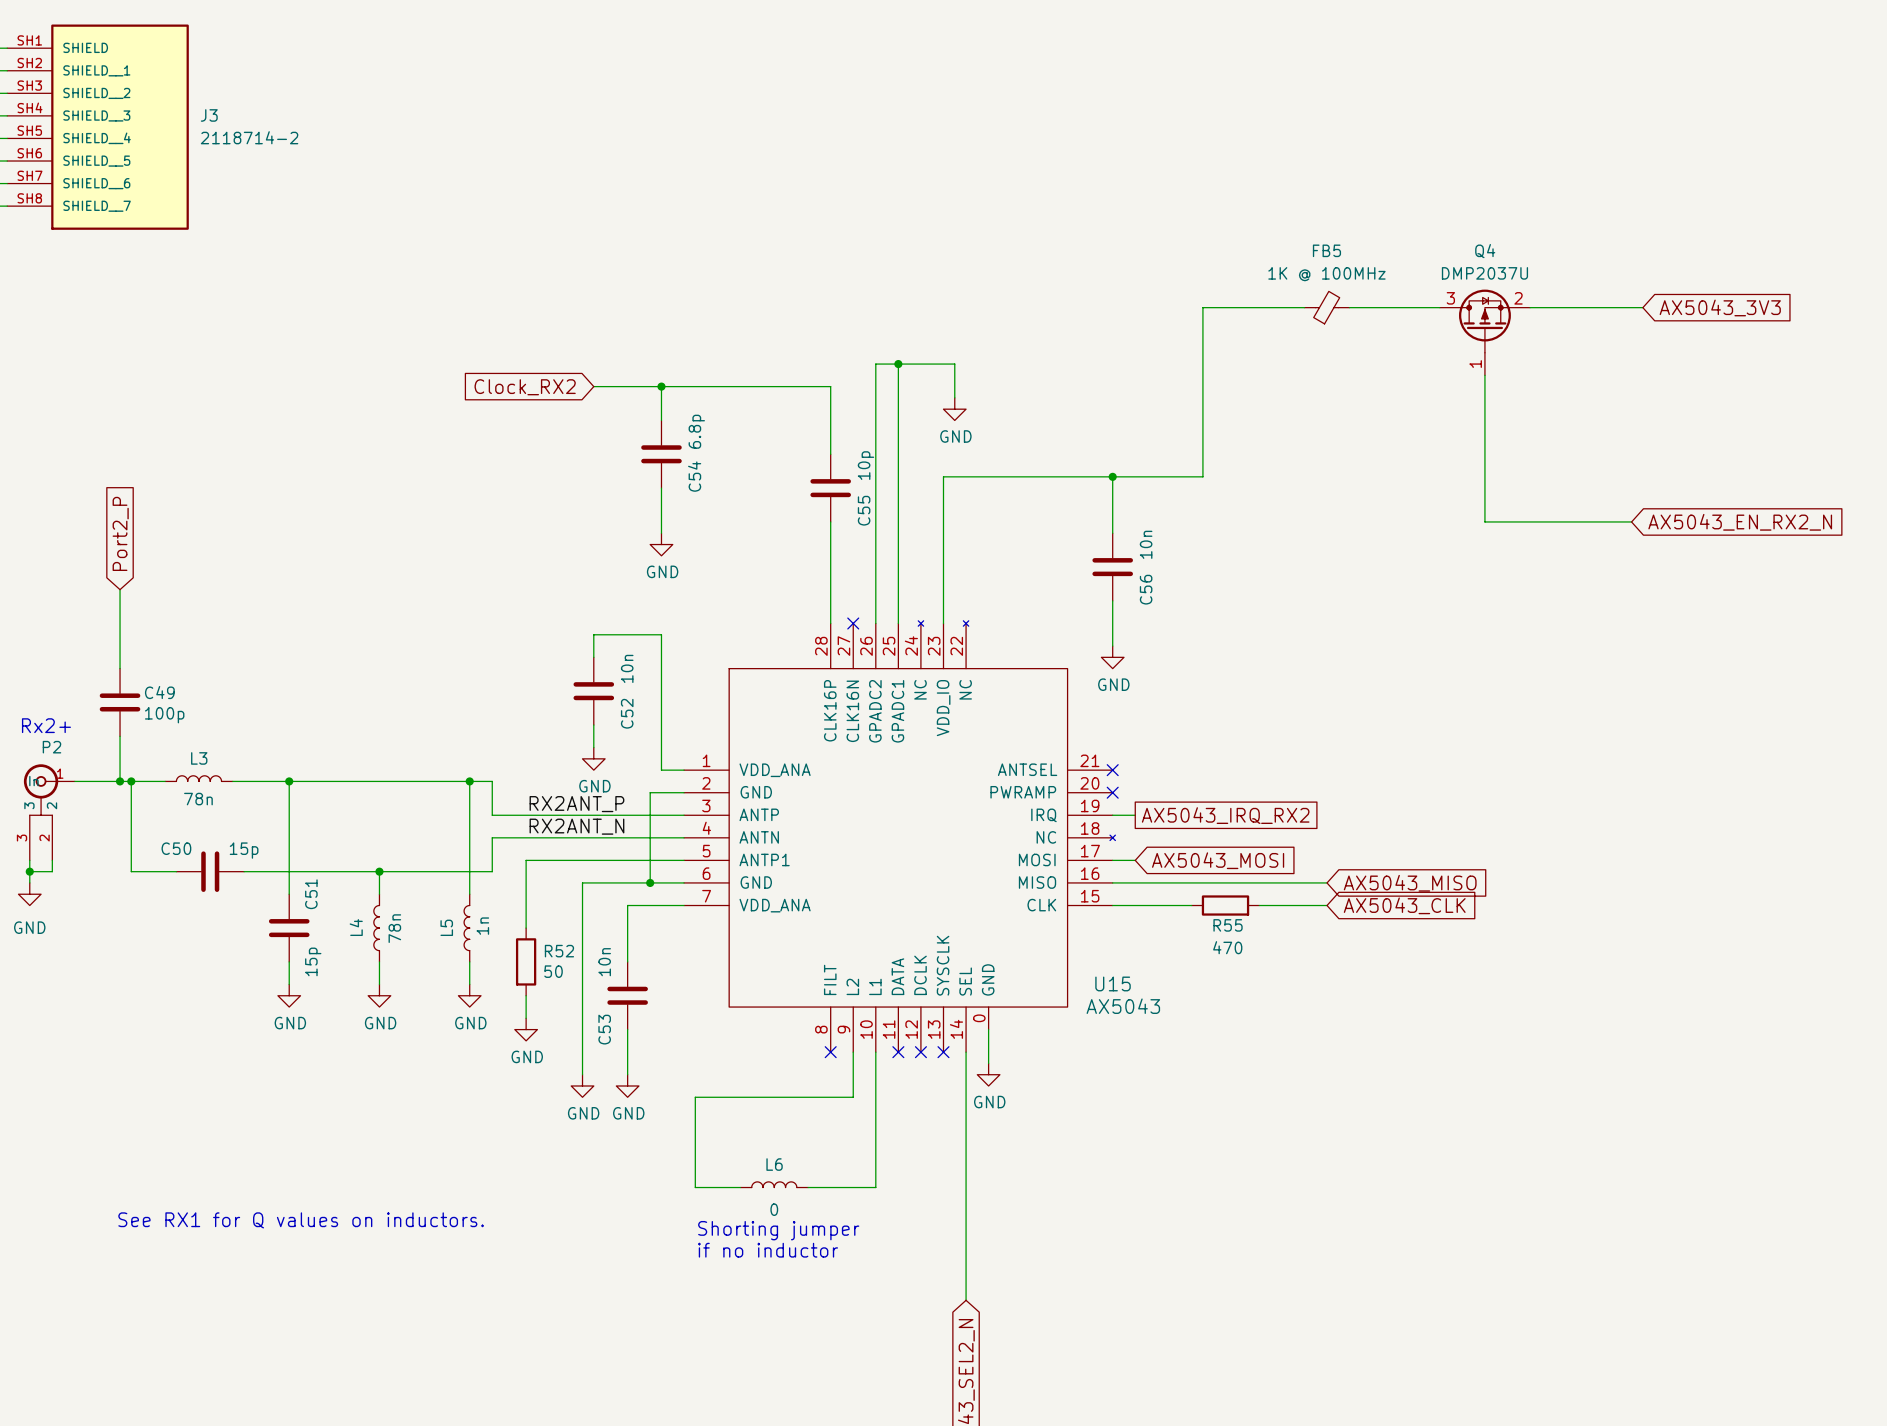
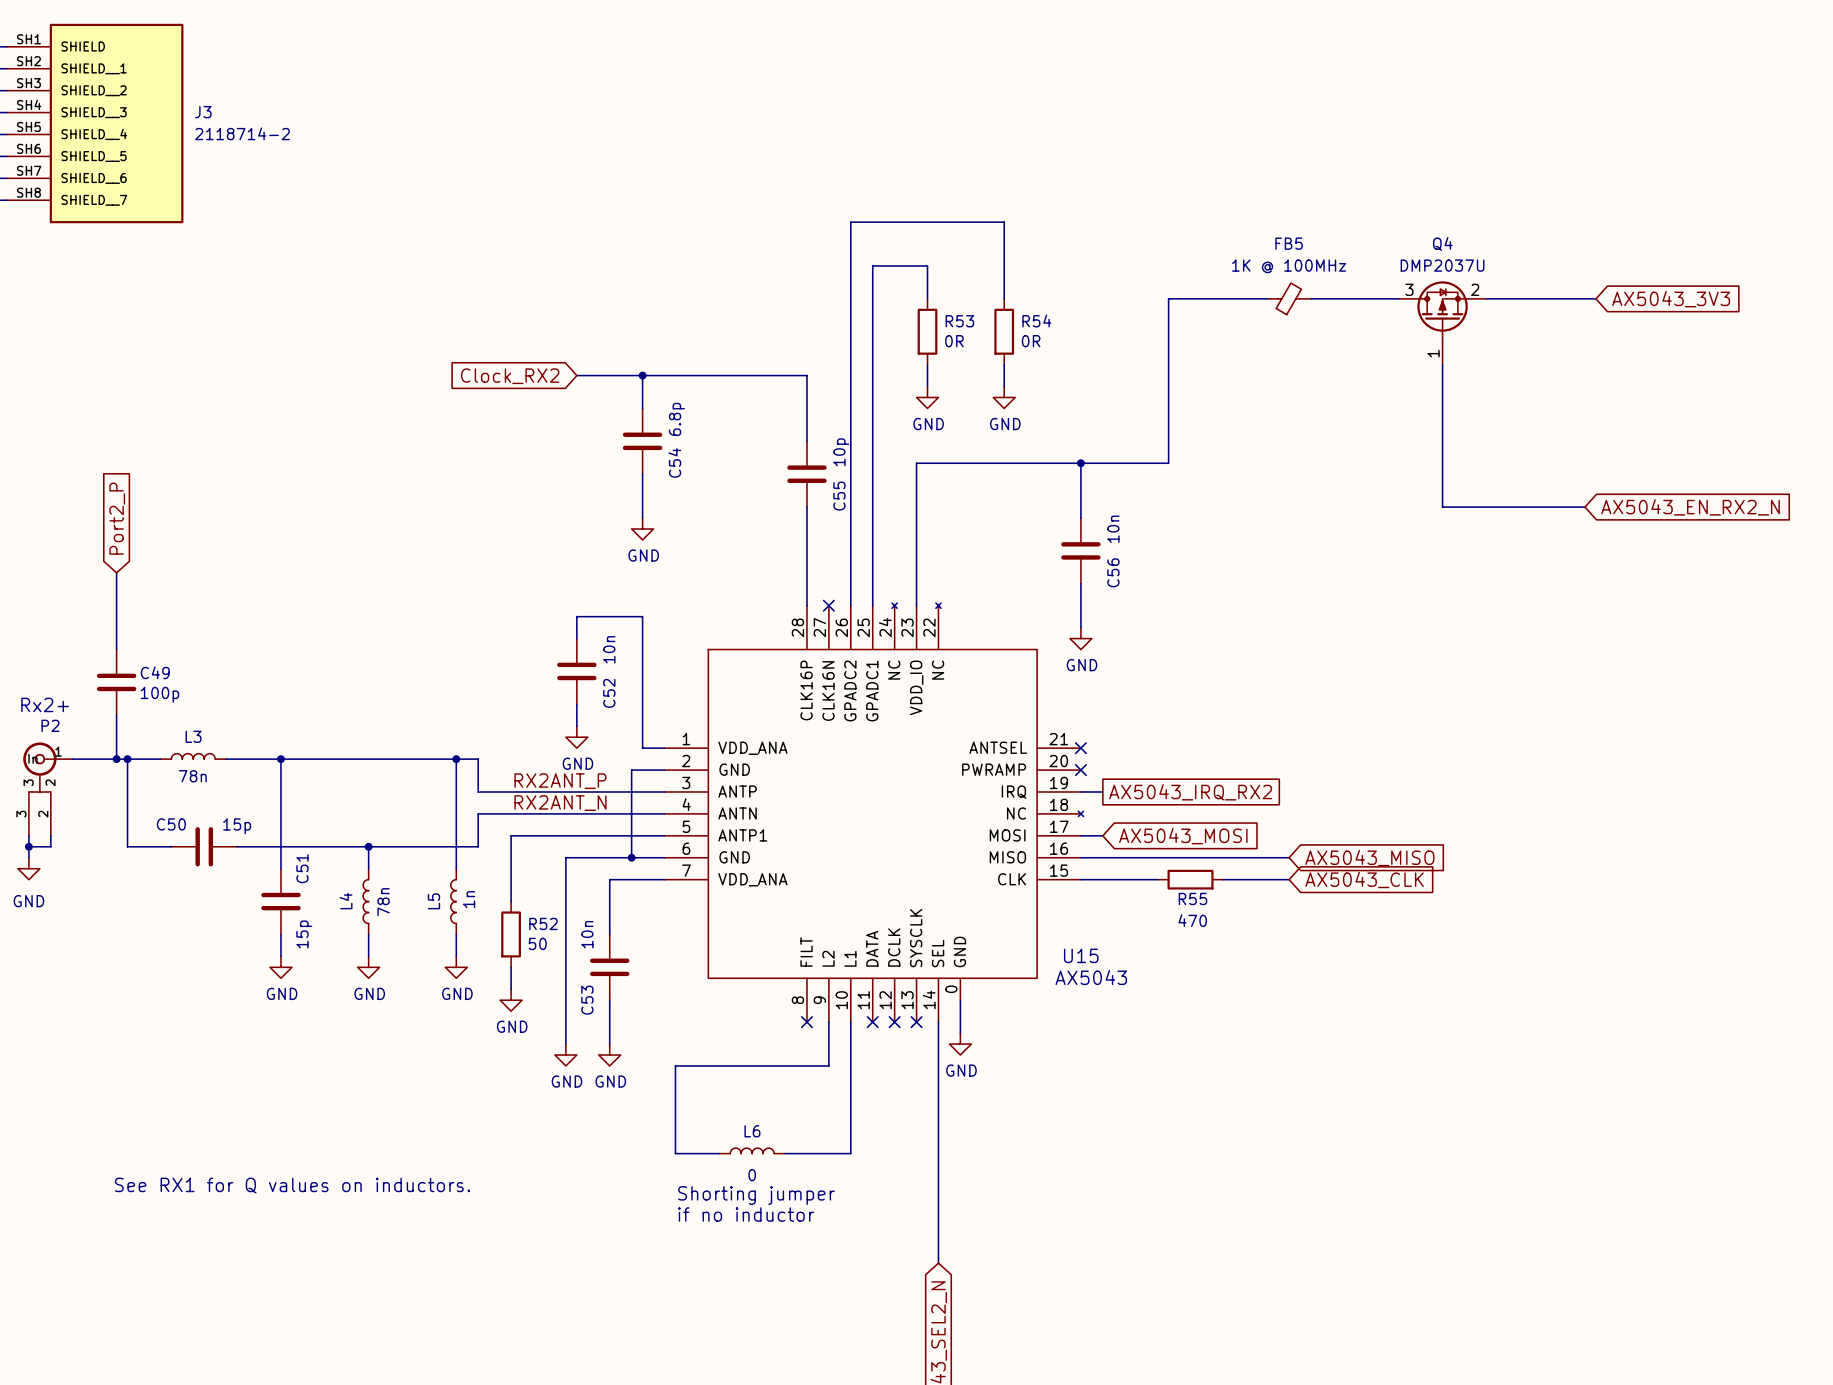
wire: none -> (927, 298) (927, 265) (872, 265) (872, 353)
R53: none -> 0R (927, 331)
R54: none -> 0R (1004, 331)
wire: (875, 364) (954, 364) (954, 375) -> (850, 353) (850, 222) (1004, 222) (1004, 298)
junction: (898, 364) -> none
wire: none -> (1004, 364) (1004, 386)
power symbol: none -> GND (1004, 397)

